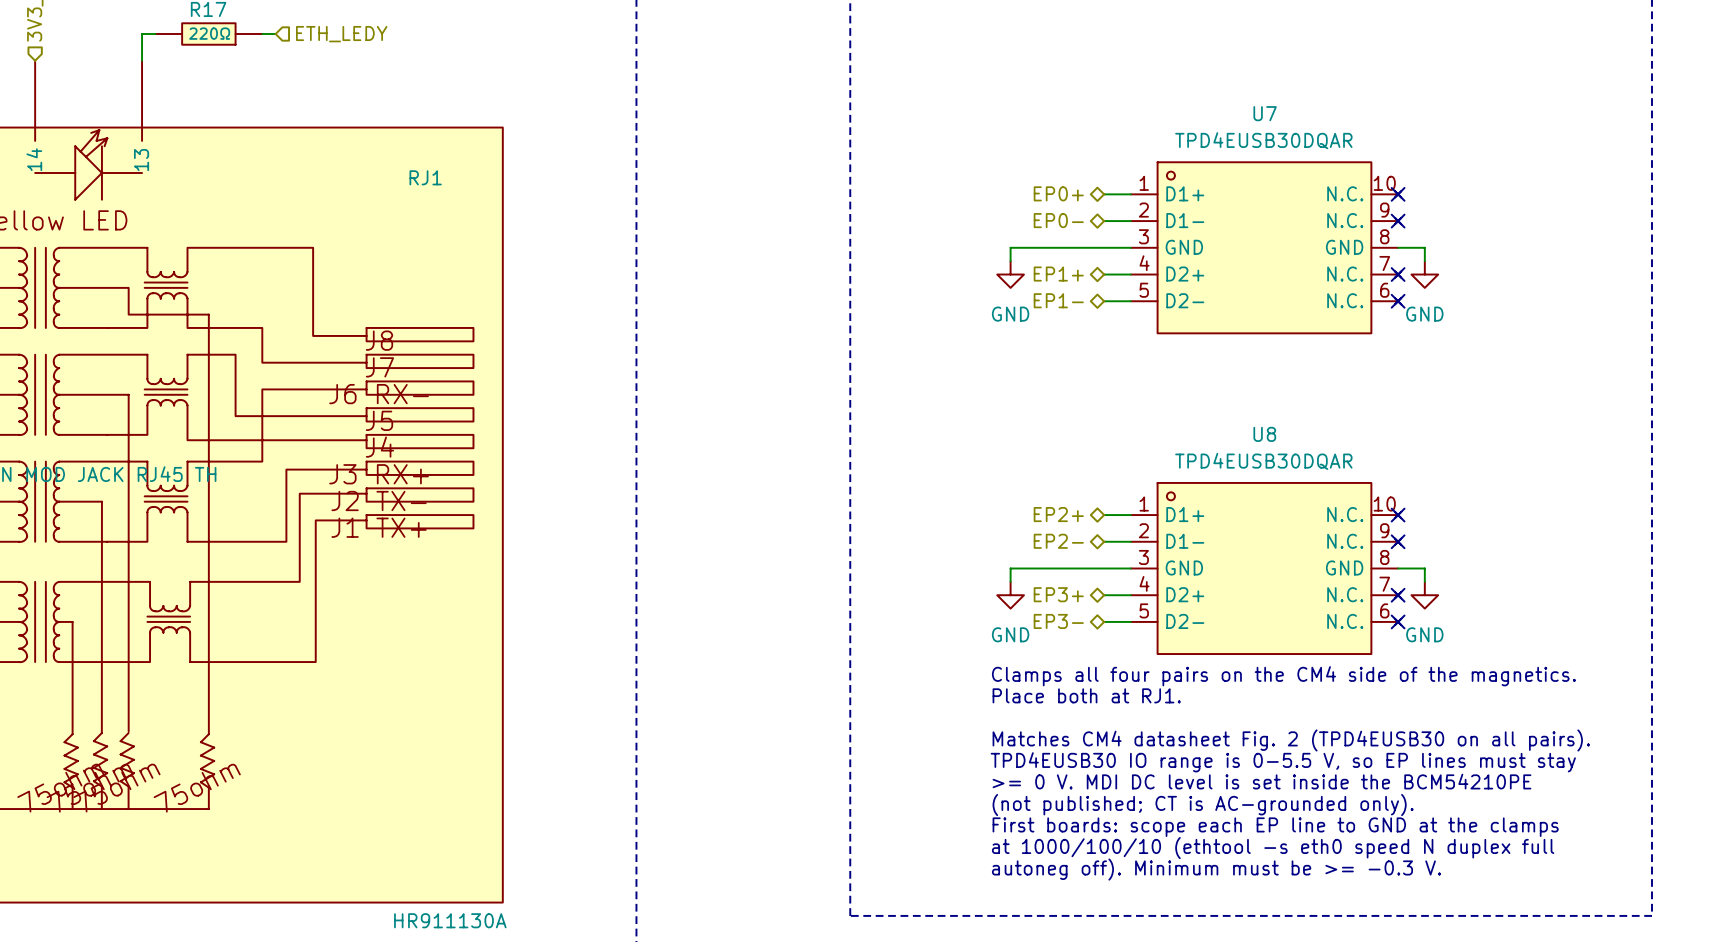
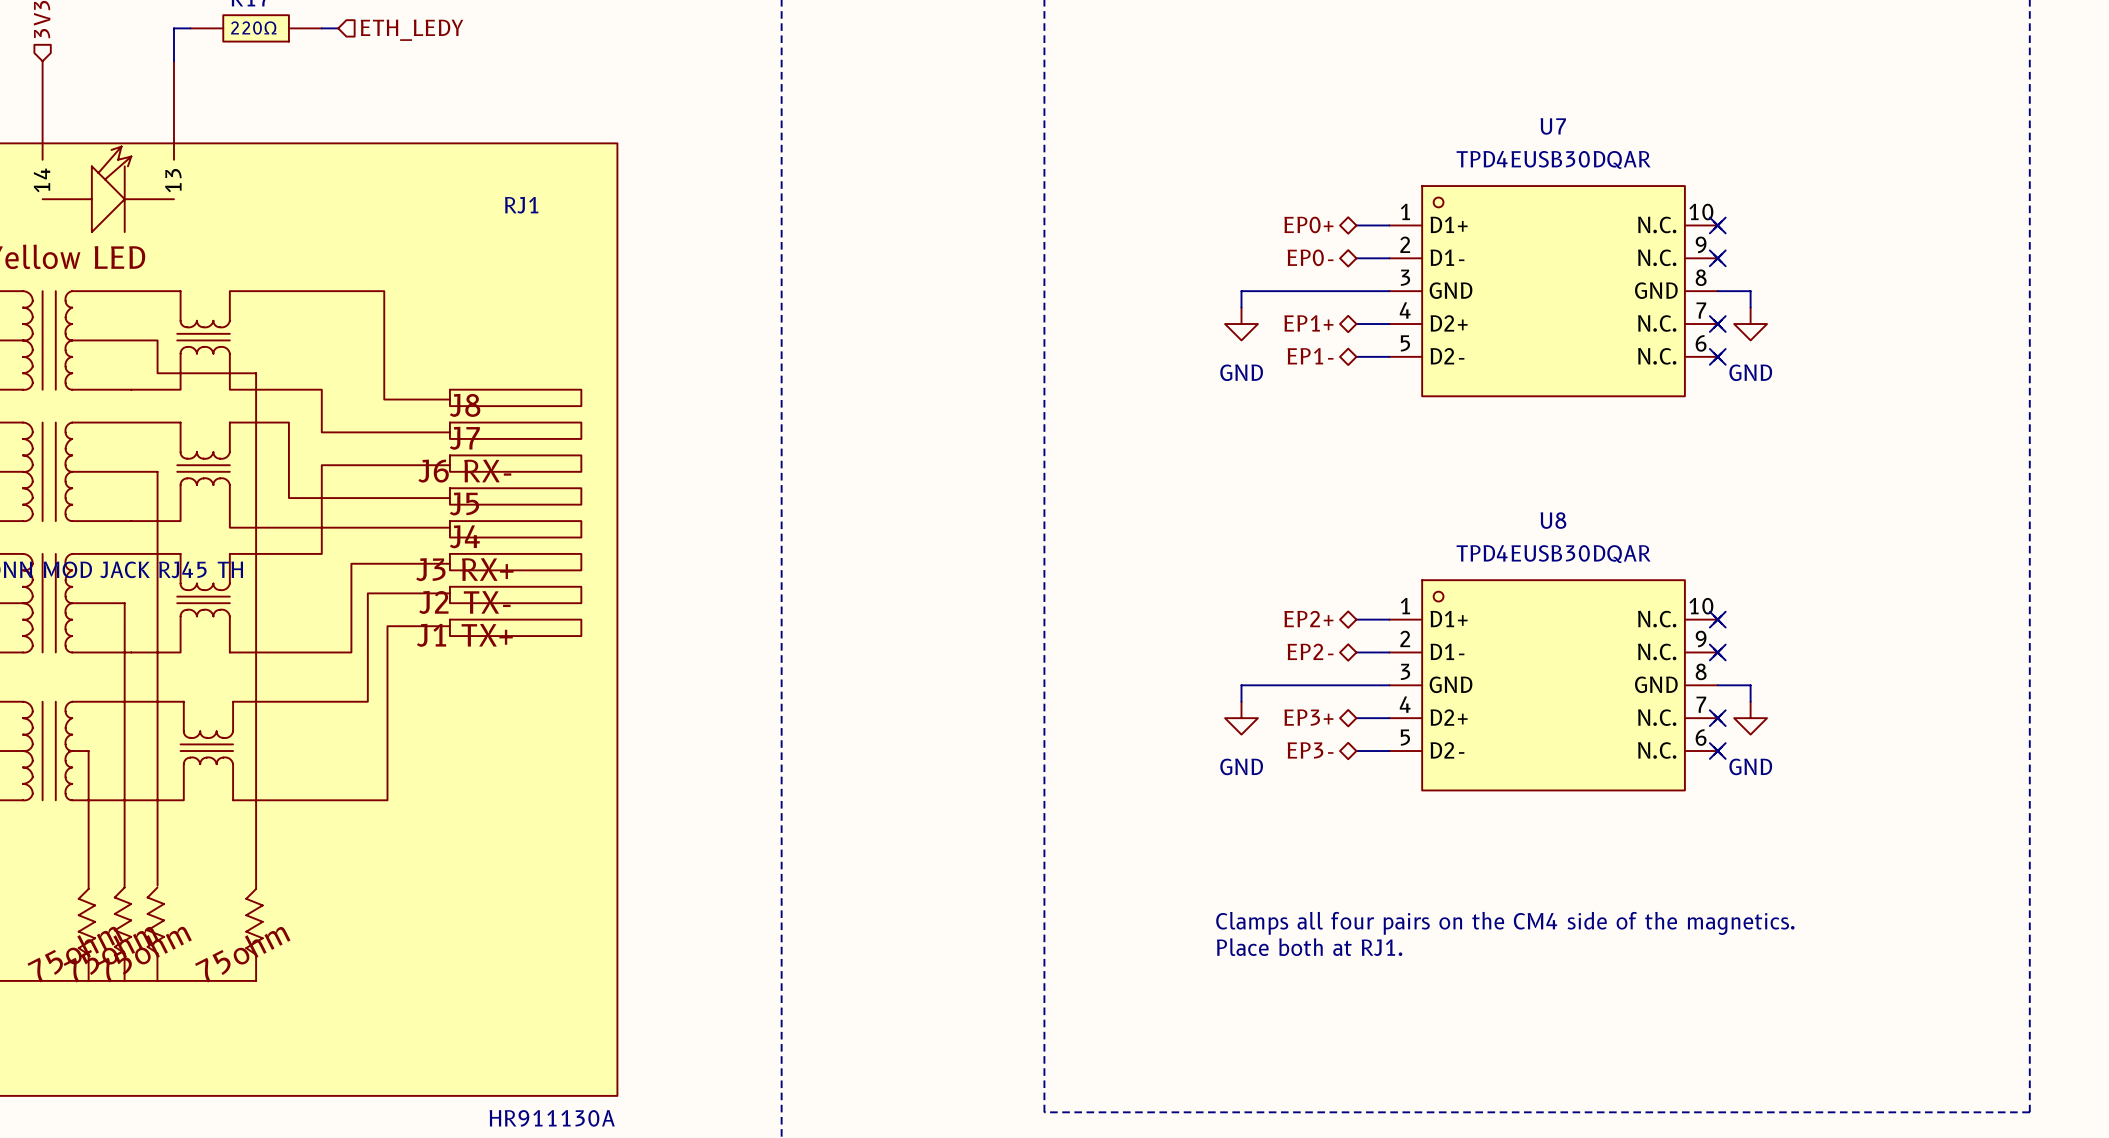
text: Clamps all four pairs on the CM4 side of the magnetics. (1283, 676) -> none
text: Place both at RJ1. (1086, 695) -> none
text: Matches CM4 datasheet Fig. 2 (TPD4EUSB30 on all pairs). (1291, 740) -> none
text: TPD4EUSB30 IO range is 0-5.5 V, so EP lines must stay (1283, 762) -> Clamps all four pairs on the CM4 side of the magnetics. (1505, 923)
text: >= 0 V. MDI DC level is set inside the BCM54210PE (1261, 781) -> Place both at RJ1. (1309, 947)
text: (not published; CT is AC-grounded only). (1203, 805) -> none
text: First boards: scope each EP line to GND at the clamps (1275, 827) -> none
text: at 1000/100/10 (ethtool -s eth0 speed N duplex full (1273, 848) -> none
text: autoneg off). Minimum must be >= -0.3 V. (1216, 869) -> none

